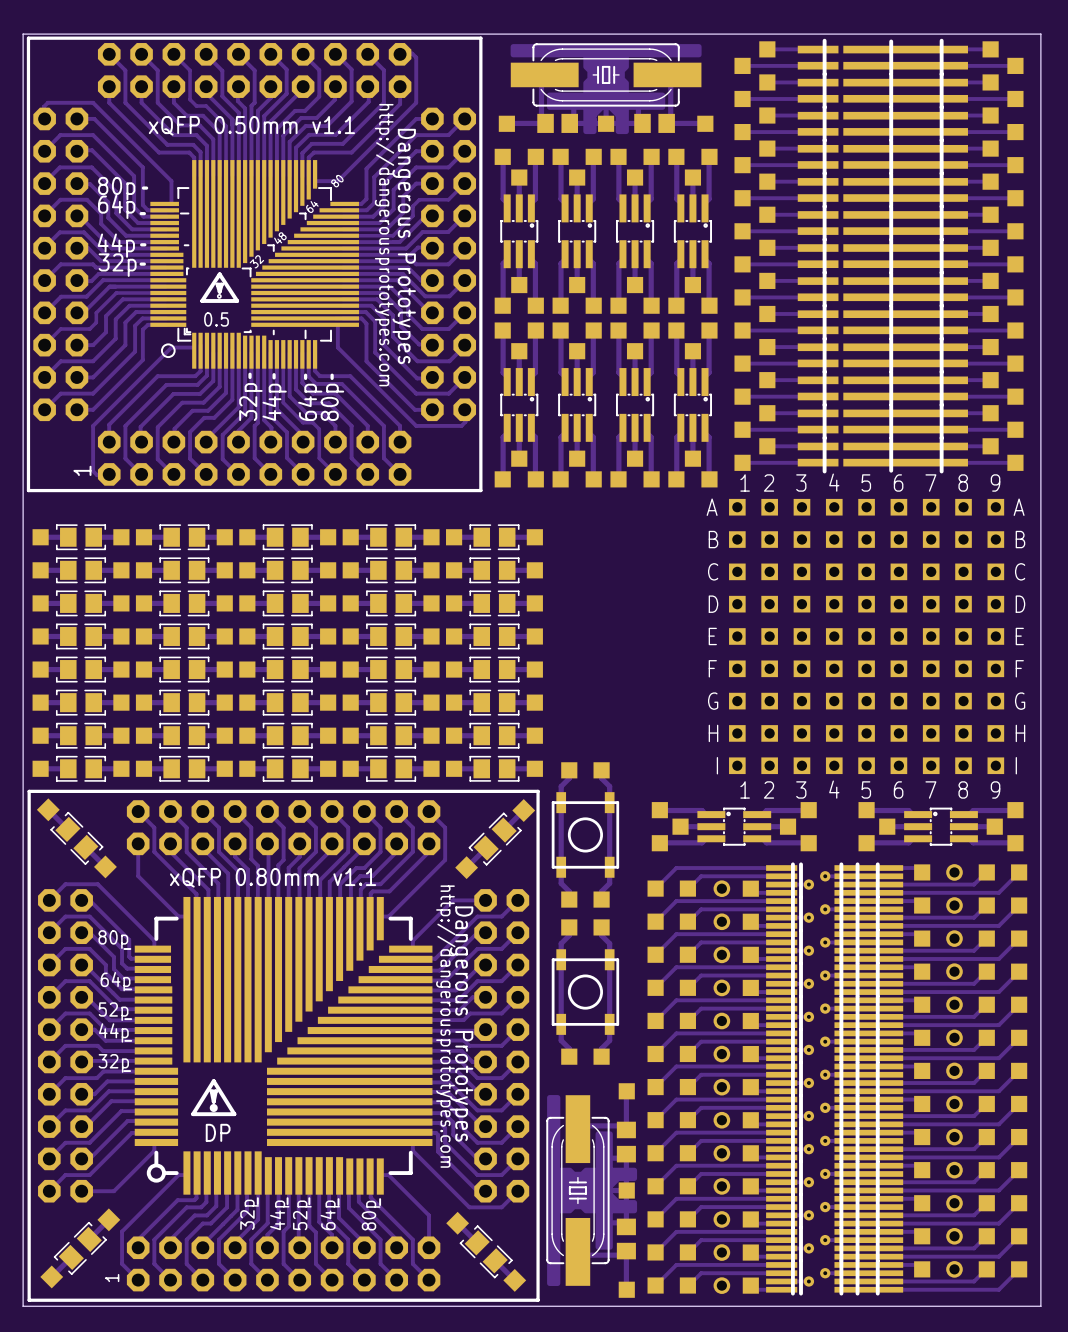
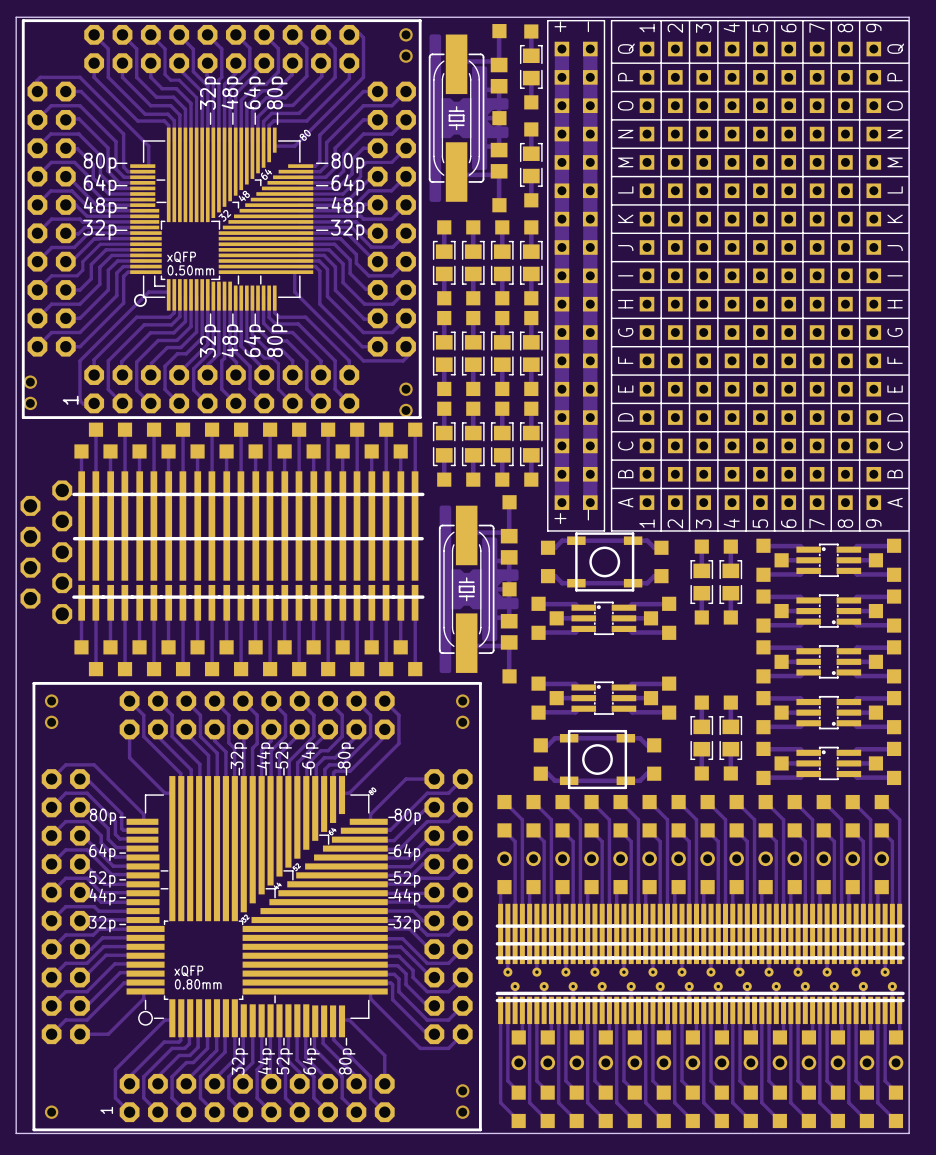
part footprint: [26, 36, 483, 493] -> [21, 19, 422, 419]
part footprint: [498, 43, 714, 135] -> [519, 24, 543, 110]
via: none -> (406, 34)
part: (878, 57) -> none
via: none -> (406, 56)
part: (878, 90) -> none
part: (878, 123) -> none
part: none -> (468, 118)
part: (878, 156) -> none
part: (878, 189) -> none
part: none -> (531, 164)
part: (878, 223) -> none
part: (519, 231) -> none
part: (577, 231) -> none
part: (635, 231) -> none
part: (692, 231) -> none
part: (878, 256) -> none
part: (878, 289) -> none
part footprint: [734, 303, 1024, 342] -> [610, 19, 910, 532]
part: none -> (444, 262)
part: none -> (473, 262)
part: none -> (502, 262)
part: none -> (531, 262)
part footprint: [552, 322, 602, 488] -> [490, 310, 514, 397]
part: none -> (576, 275)
part: (878, 355) -> none
part: (878, 388) -> none
part: (519, 404) -> none
part: (635, 404) -> none
part: (692, 404) -> none
part: none -> (444, 353)
part: none -> (473, 353)
part: none -> (531, 353)
part: (878, 421) -> none
via: none -> (30, 382)
part: (878, 454) -> none
via: none -> (406, 389)
via: none -> (30, 403)
via: none -> (406, 410)
part: none -> (473, 444)
part: none -> (502, 444)
part: none -> (531, 444)
part: (81, 537) -> none
part: (184, 537) -> none
part: (287, 537) -> none
part: (391, 537) -> none
part rotation: 0° (494, 537) -> 90° clockwise (444, 444)
part: (81, 570) -> none
part: (184, 570) -> none
part: (287, 570) -> none
part: (391, 570) -> none
part: (494, 570) -> none
part: (81, 603) -> none
part: (184, 603) -> none
part: (287, 603) -> none
part: (391, 603) -> none
part: (494, 603) -> none
part: (81, 636) -> none
part: (184, 636) -> none
part: (287, 636) -> none
part: (391, 636) -> none
part: (494, 636) -> none
part: (866, 636) -> none
part: none -> (88, 549)
part: none -> (117, 549)
part: none -> (146, 549)
part: none -> (175, 549)
part: none -> (204, 549)
part: none -> (233, 549)
part: none -> (262, 549)
part: none -> (291, 549)
part: none -> (320, 549)
part: none -> (349, 549)
part: none -> (378, 549)
part: none -> (407, 549)
part: none -> (46, 552)
part: none -> (828, 560)
part: none -> (604, 561)
part: (81, 669) -> none
part: (184, 669) -> none
part: (287, 669) -> none
part: (391, 669) -> none
part: (494, 669) -> none
part: none -> (701, 582)
part: none -> (730, 582)
part: none -> (478, 589)
part: (81, 702) -> none
part: (184, 702) -> none
part: (287, 702) -> none
part: (391, 702) -> none
part: (494, 702) -> none
part: none -> (828, 611)
part: none -> (603, 618)
part: (81, 735) -> none
part: (184, 735) -> none
part: (287, 735) -> none
part: (391, 735) -> none
part: (494, 735) -> none
part: (81, 768) -> none
part: (184, 768) -> none
part: (287, 768) -> none
part: (391, 768) -> none
part: (494, 768) -> none
part: none -> (828, 661)
via: none -> (51, 701)
via: none -> (462, 701)
part position: (734, 826) -> (603, 698)
part rotation: 0° (941, 826) -> 180° (828, 712)
part: (585, 834) -> none
via: none -> (51, 722)
via: none -> (462, 722)
part: (76, 838) -> none
part: (495, 839) -> none
part: none -> (701, 738)
part: none -> (730, 738)
part: none -> (597, 759)
part: (837, 880) -> none
part: none -> (828, 763)
part: (837, 913) -> none
part: (837, 946) -> none
part: (837, 979) -> none
part: (585, 992) -> none
part: (837, 1012) -> none
part: (283, 1045) -> none
part: (837, 1045) -> none
part: none -> (257, 906)
part: (837, 1078) -> none
part: none -> (511, 961)
part: none -> (540, 961)
part: none -> (569, 961)
part: none -> (598, 961)
part: none -> (627, 961)
part: none -> (656, 961)
part: none -> (685, 961)
part: none -> (714, 961)
part: none -> (743, 961)
part: none -> (772, 961)
part: none -> (801, 961)
part: none -> (830, 961)
part: none -> (859, 961)
part: none -> (888, 961)
part: (837, 1112) -> none
part: (837, 1145) -> none
part: (837, 1178) -> none
part: (591, 1190) -> none
part: (837, 1211) -> none
part: (837, 1244) -> none
part: (80, 1248) -> none
part: (486, 1251) -> none
via: none -> (462, 1090)
part: (837, 1277) -> none
via: none -> (51, 1112)
via: none -> (462, 1112)

